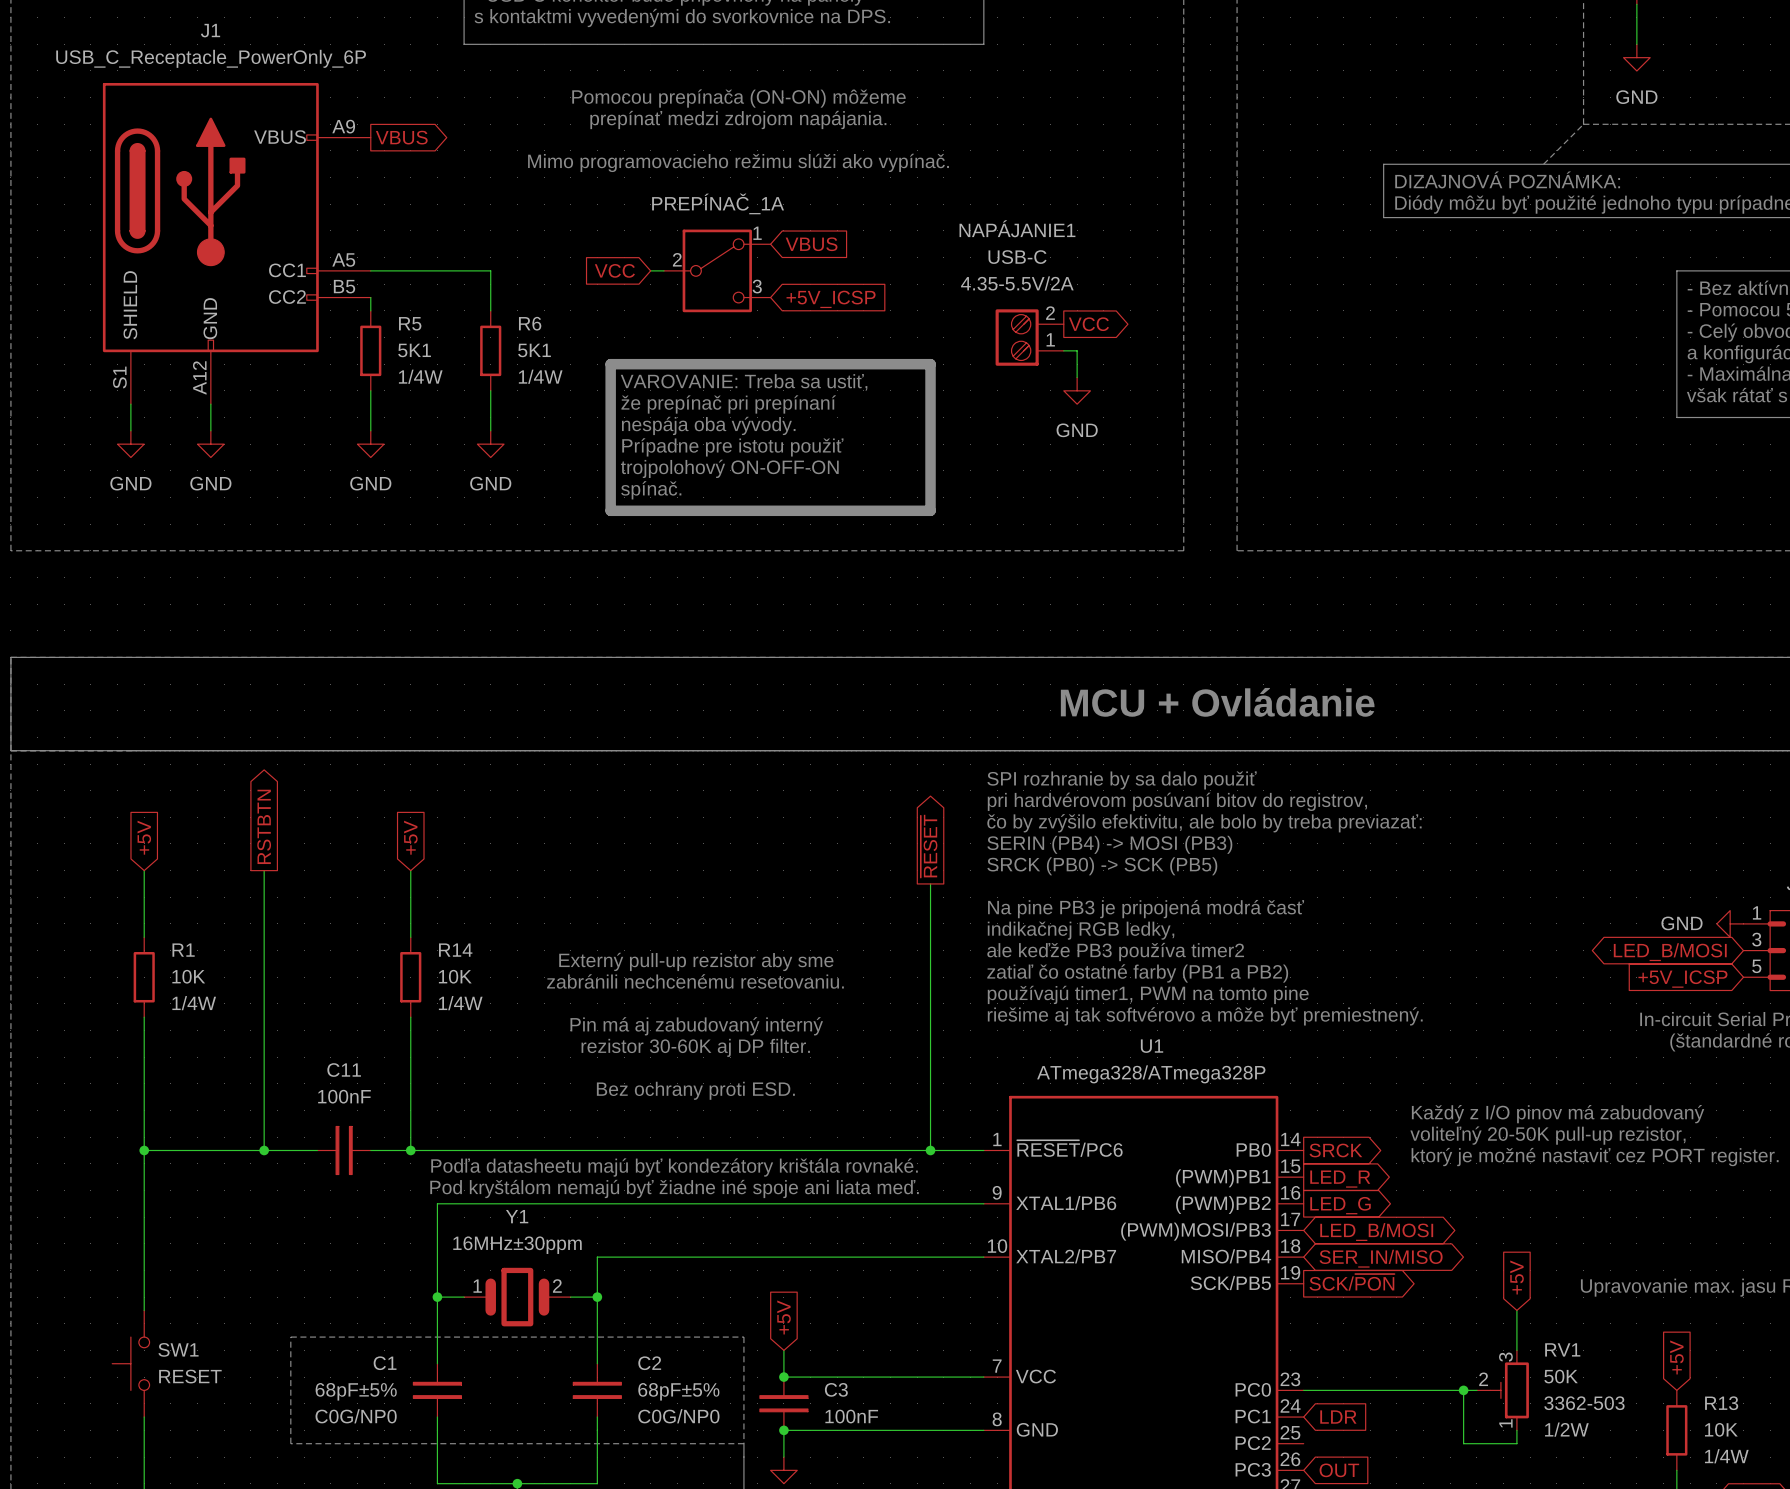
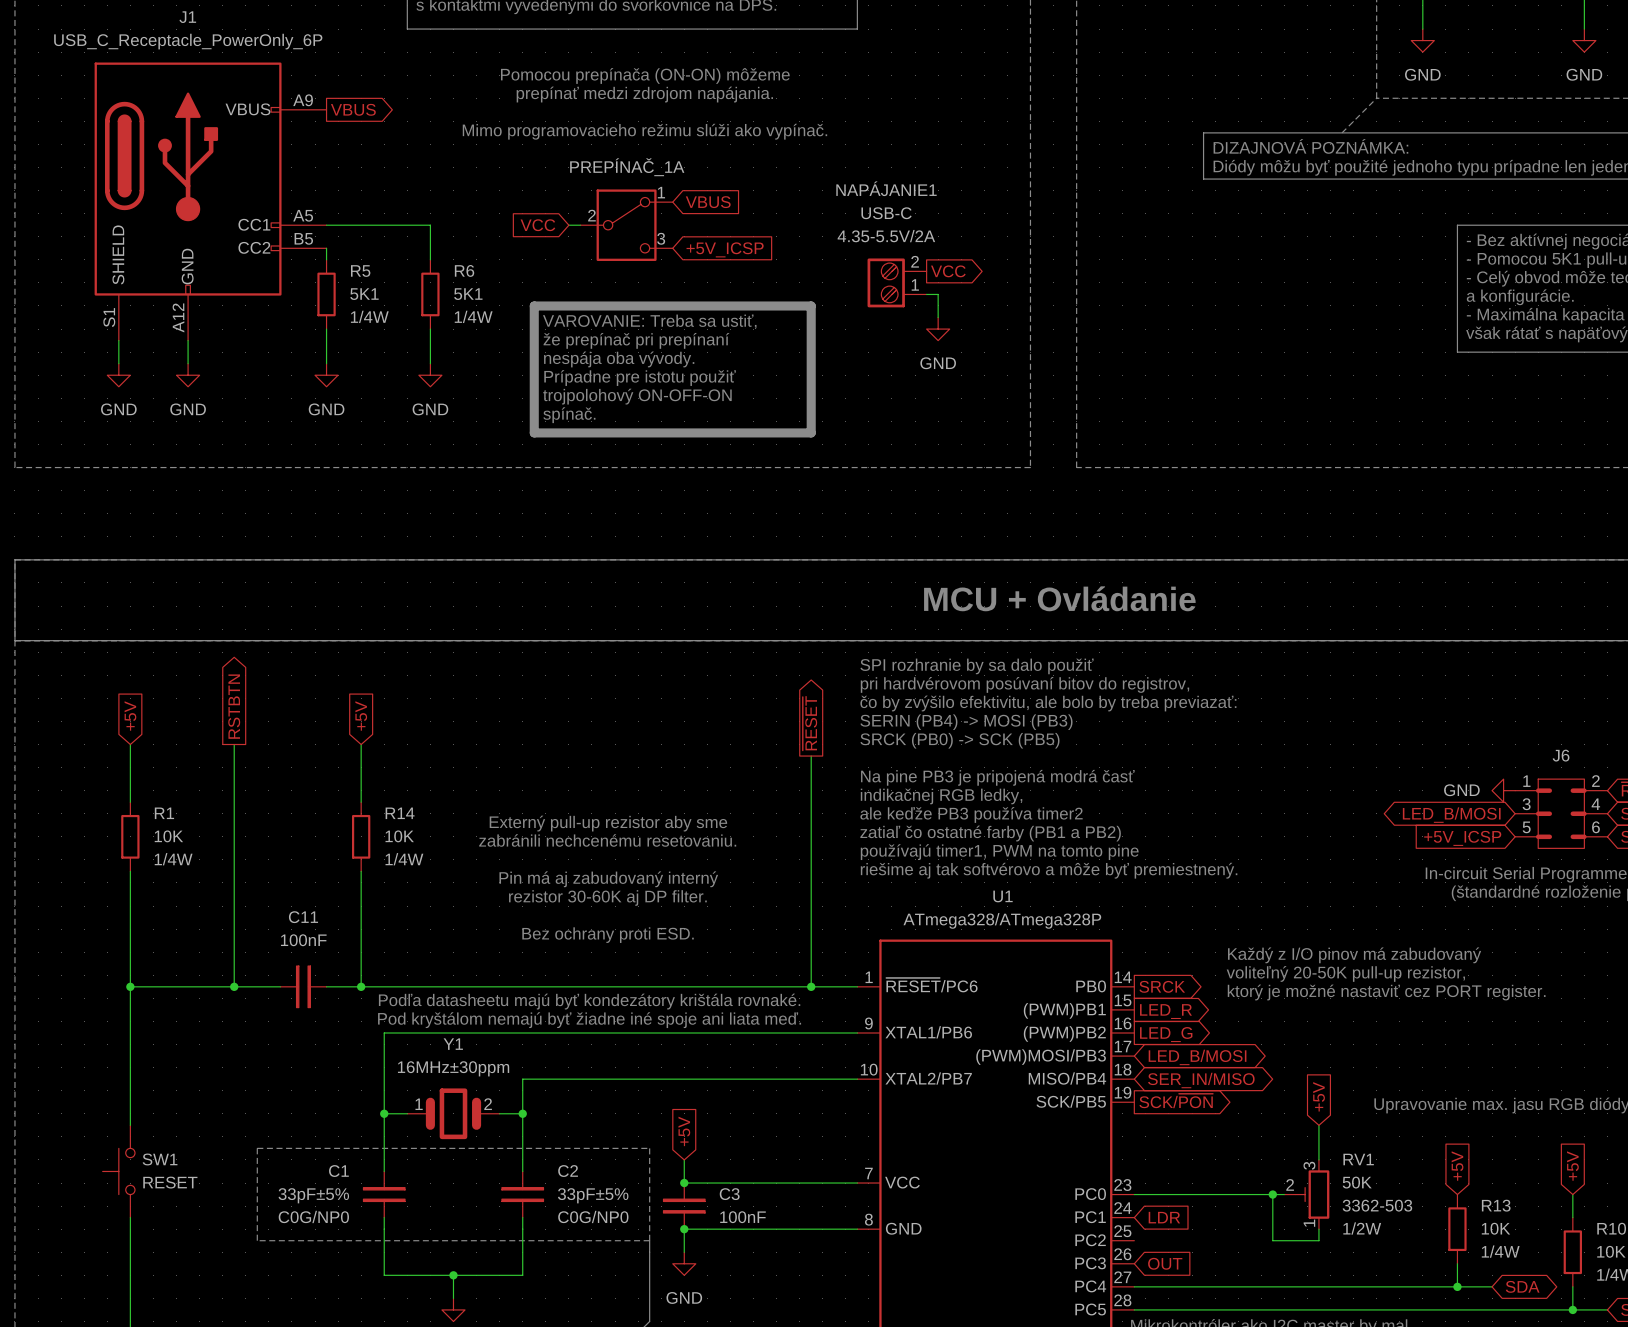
C1 value: 68pF±5% (356, 1391) -> 33pF±5% (313, 1195)
C2 value: 68pF±5% (678, 1391) -> 33pF±5% (593, 1195)

